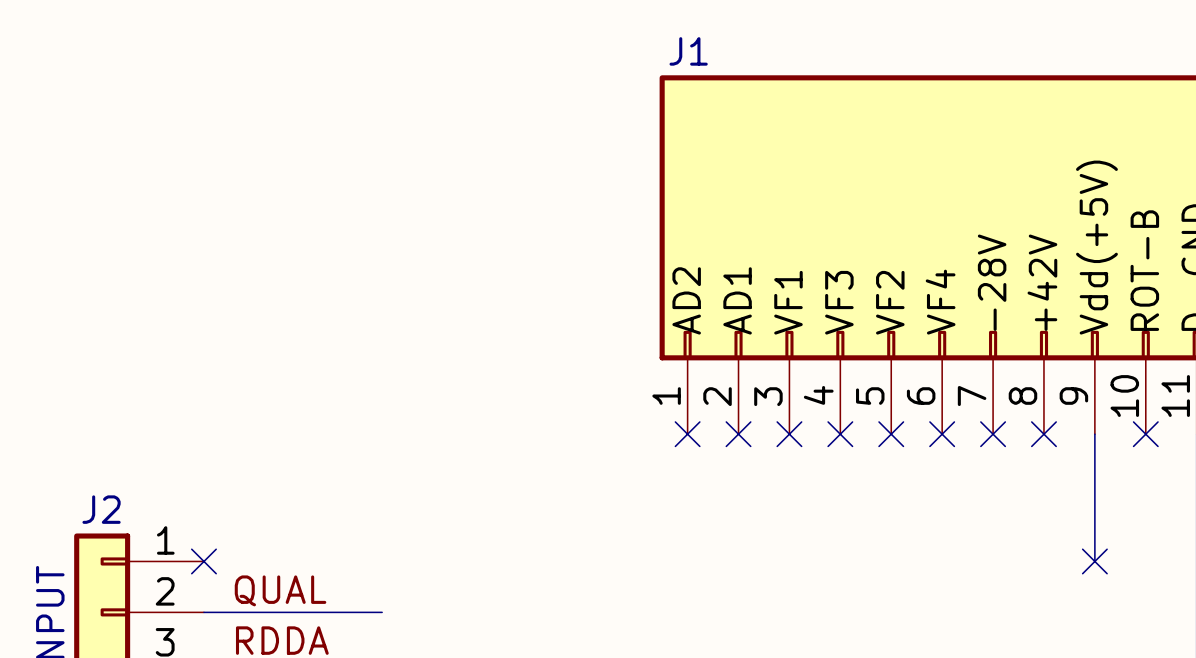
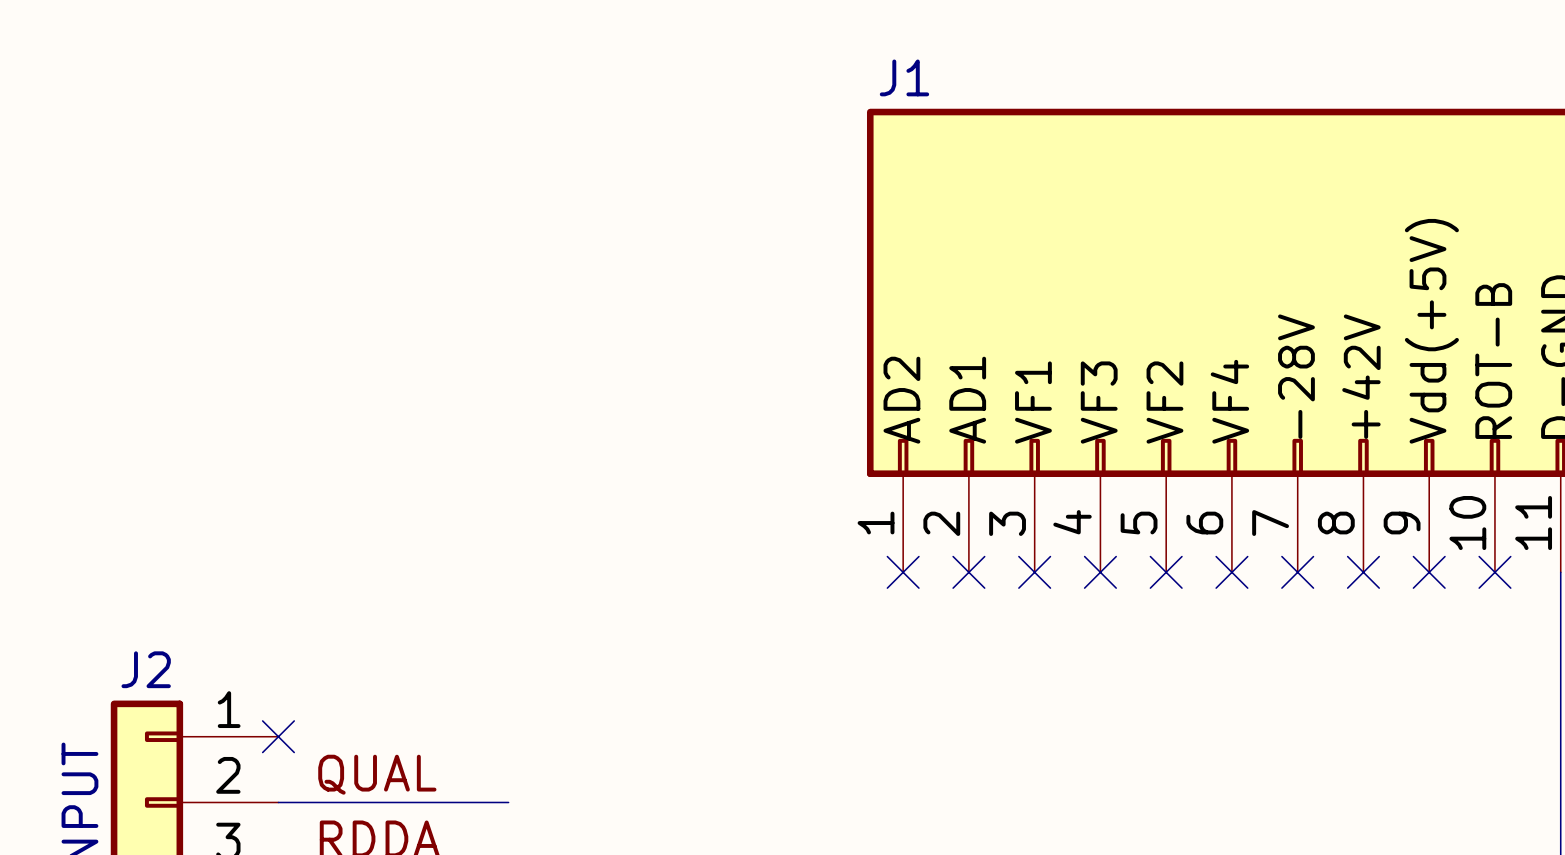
wire: (1094, 434) (1094, 561) -> none
no-connect mark: none -> (1429, 572)
no-connect mark: (1094, 561) -> none

